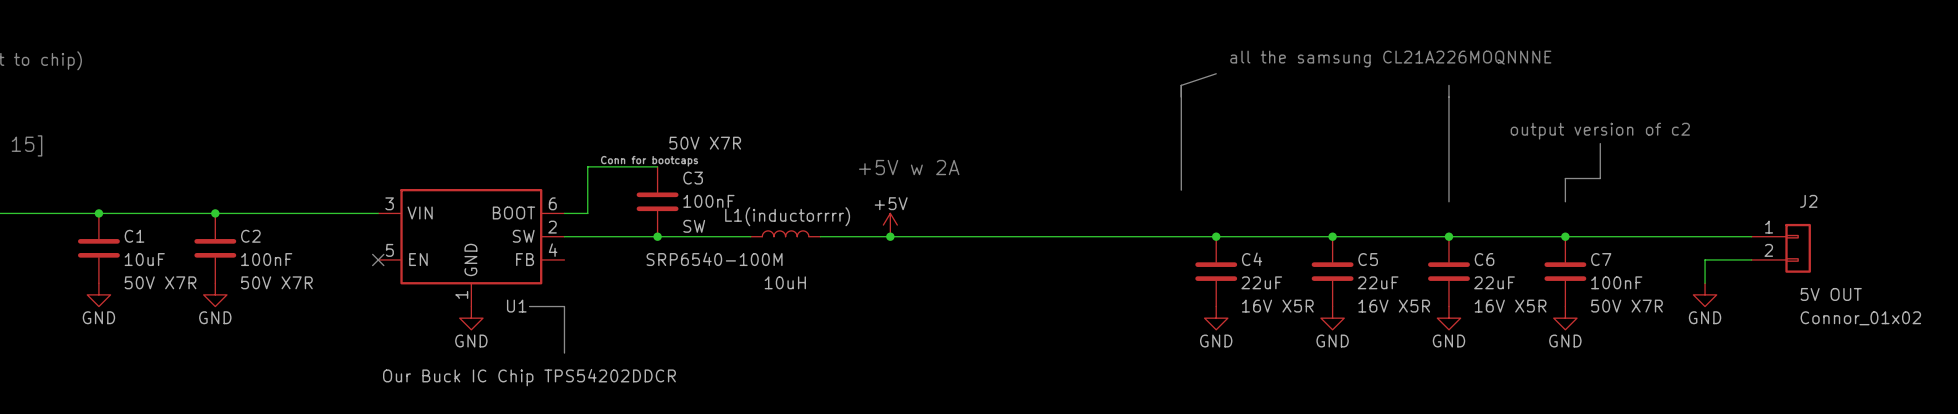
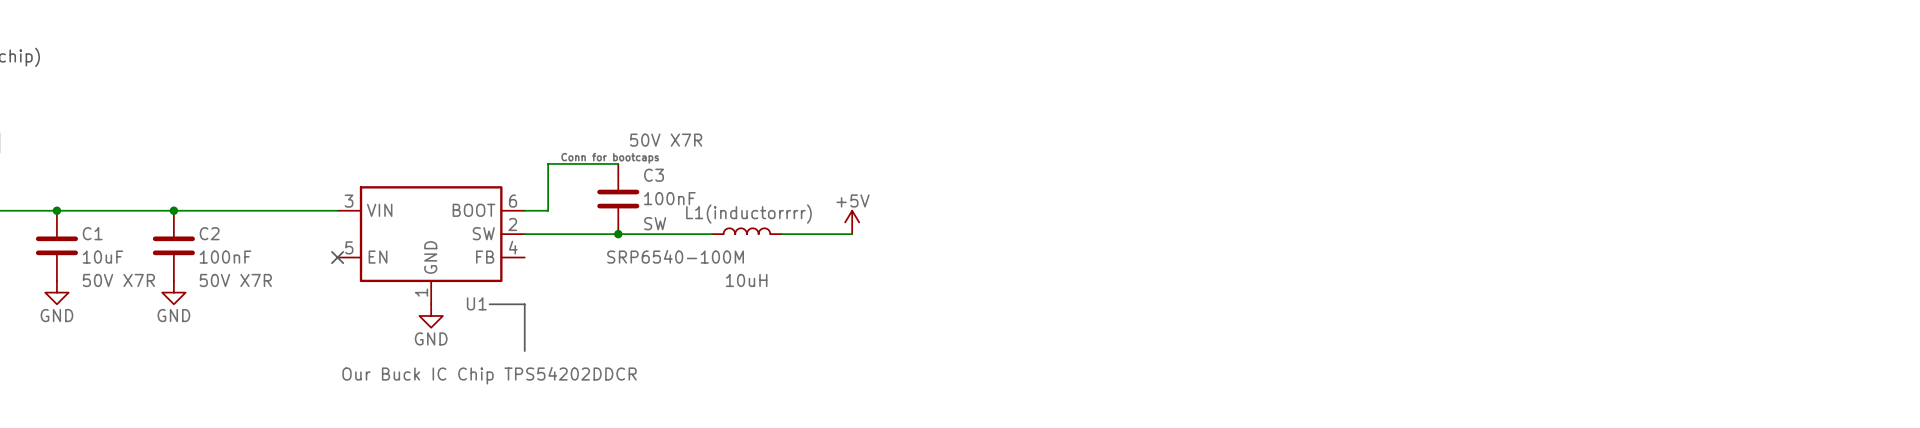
text: all the samsung CL21A226MOQNNNE (1390, 59) -> none
line: (1216, 73) (1181, 85) (1181, 190) -> none
line: (1448, 85) (1448, 201) -> none
text: output version of c2 (1600, 131) -> none
line: (1600, 143) (1600, 178) (1565, 178) (1565, 201) -> none
text: +5V w 2A (909, 167) -> none
wire: (890, 236) (1751, 236) -> none
junction: (890, 236) -> none
junction: (1216, 236) -> none
junction: (1332, 236) -> none
junction: (1448, 236) -> none
junction: (1565, 236) -> none
J2: Connor_01x02 (1781, 248) -> none
wire: (1751, 259) (1705, 259) (1705, 283) -> none
C4: 22uF (1216, 271) -> none
C5: 22uF (1332, 271) -> none
C6: 22uF (1448, 271) -> none
C7: 100nF (1565, 271) -> none
power symbol: GND (1705, 294) -> none
power symbol: GND (1216, 318) -> none
power symbol: GND (1332, 318) -> none
power symbol: GND (1448, 318) -> none
power symbol: GND (1565, 318) -> none

